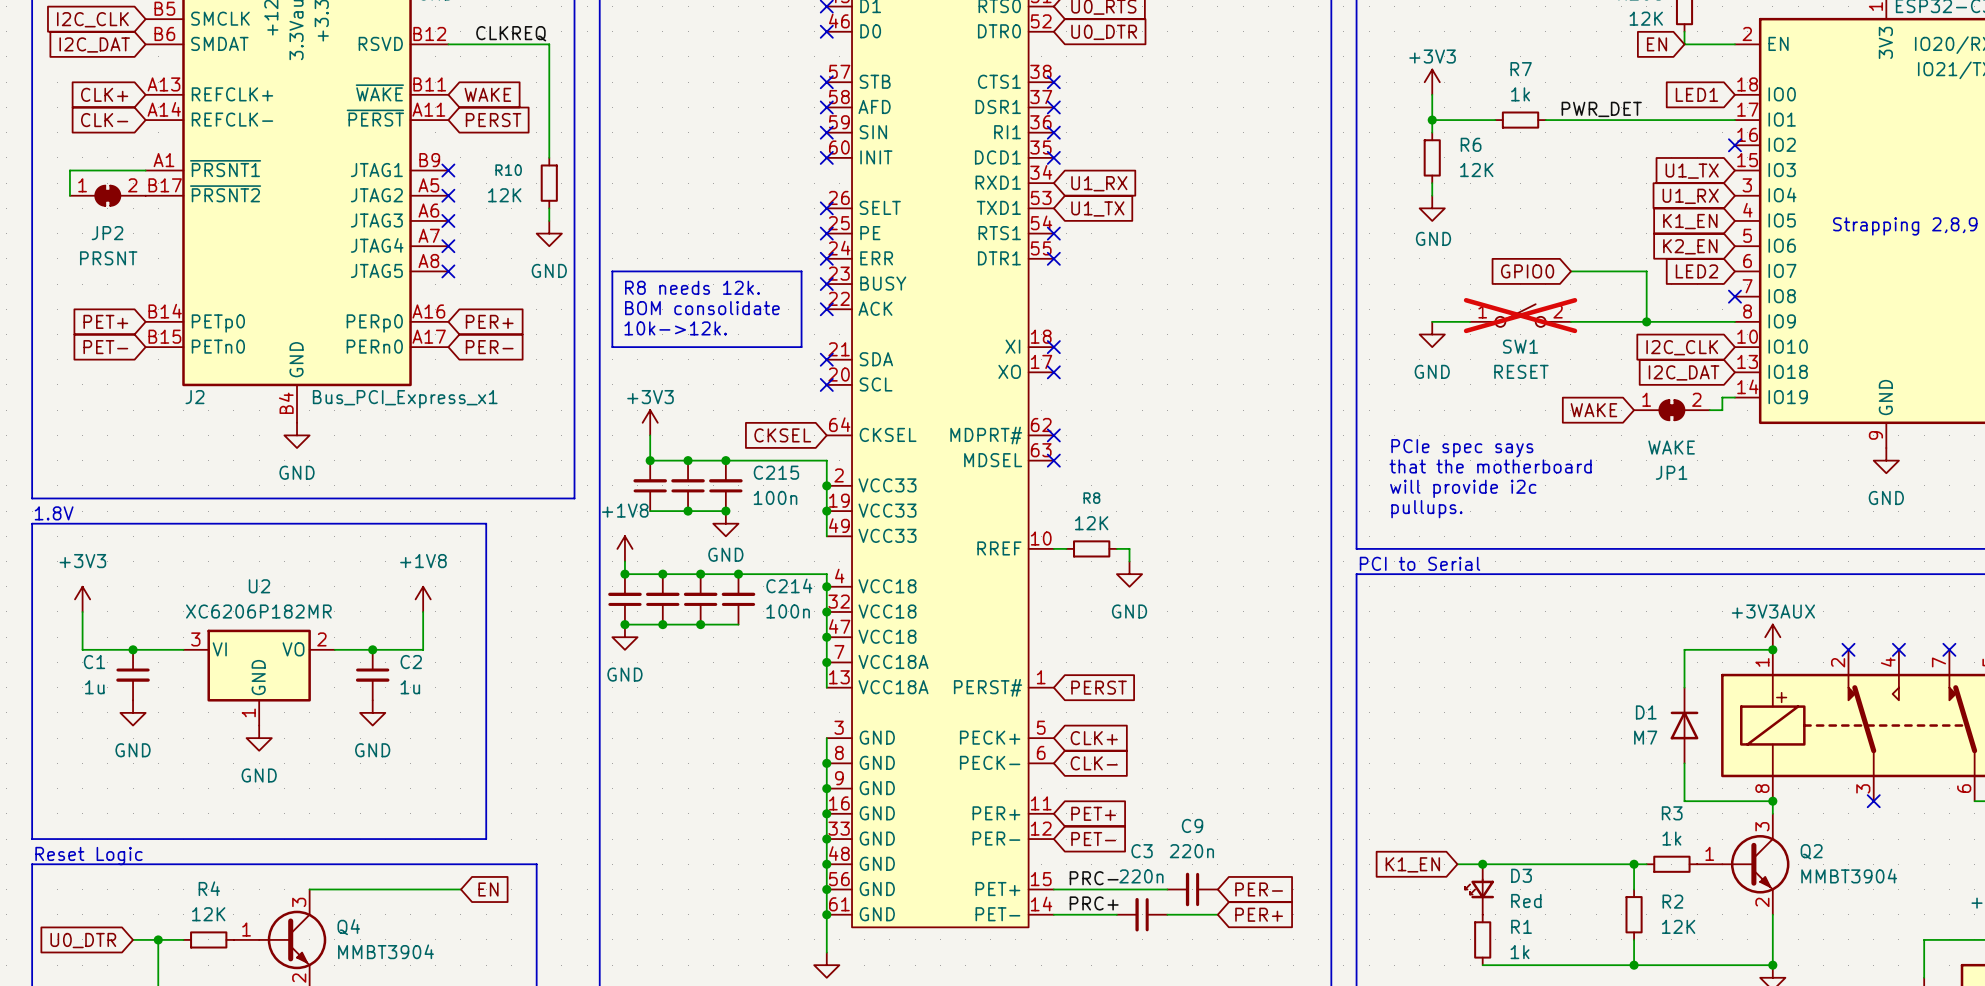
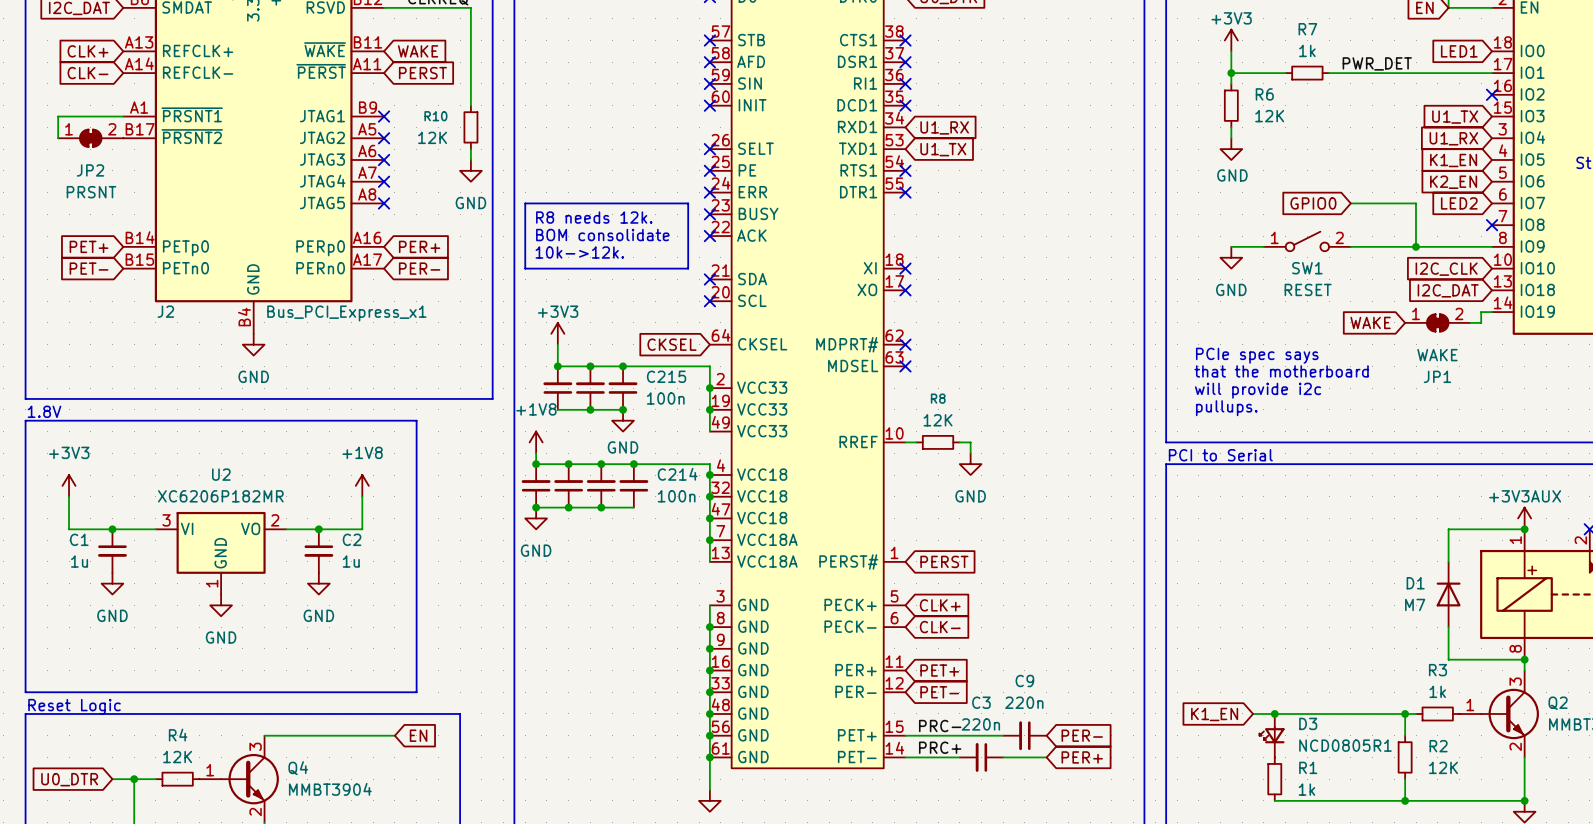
SW1 do-not-place cross: (1520, 315) -> none
D3 value: Red (1526, 901) -> NCD0805R1 (1345, 745)

